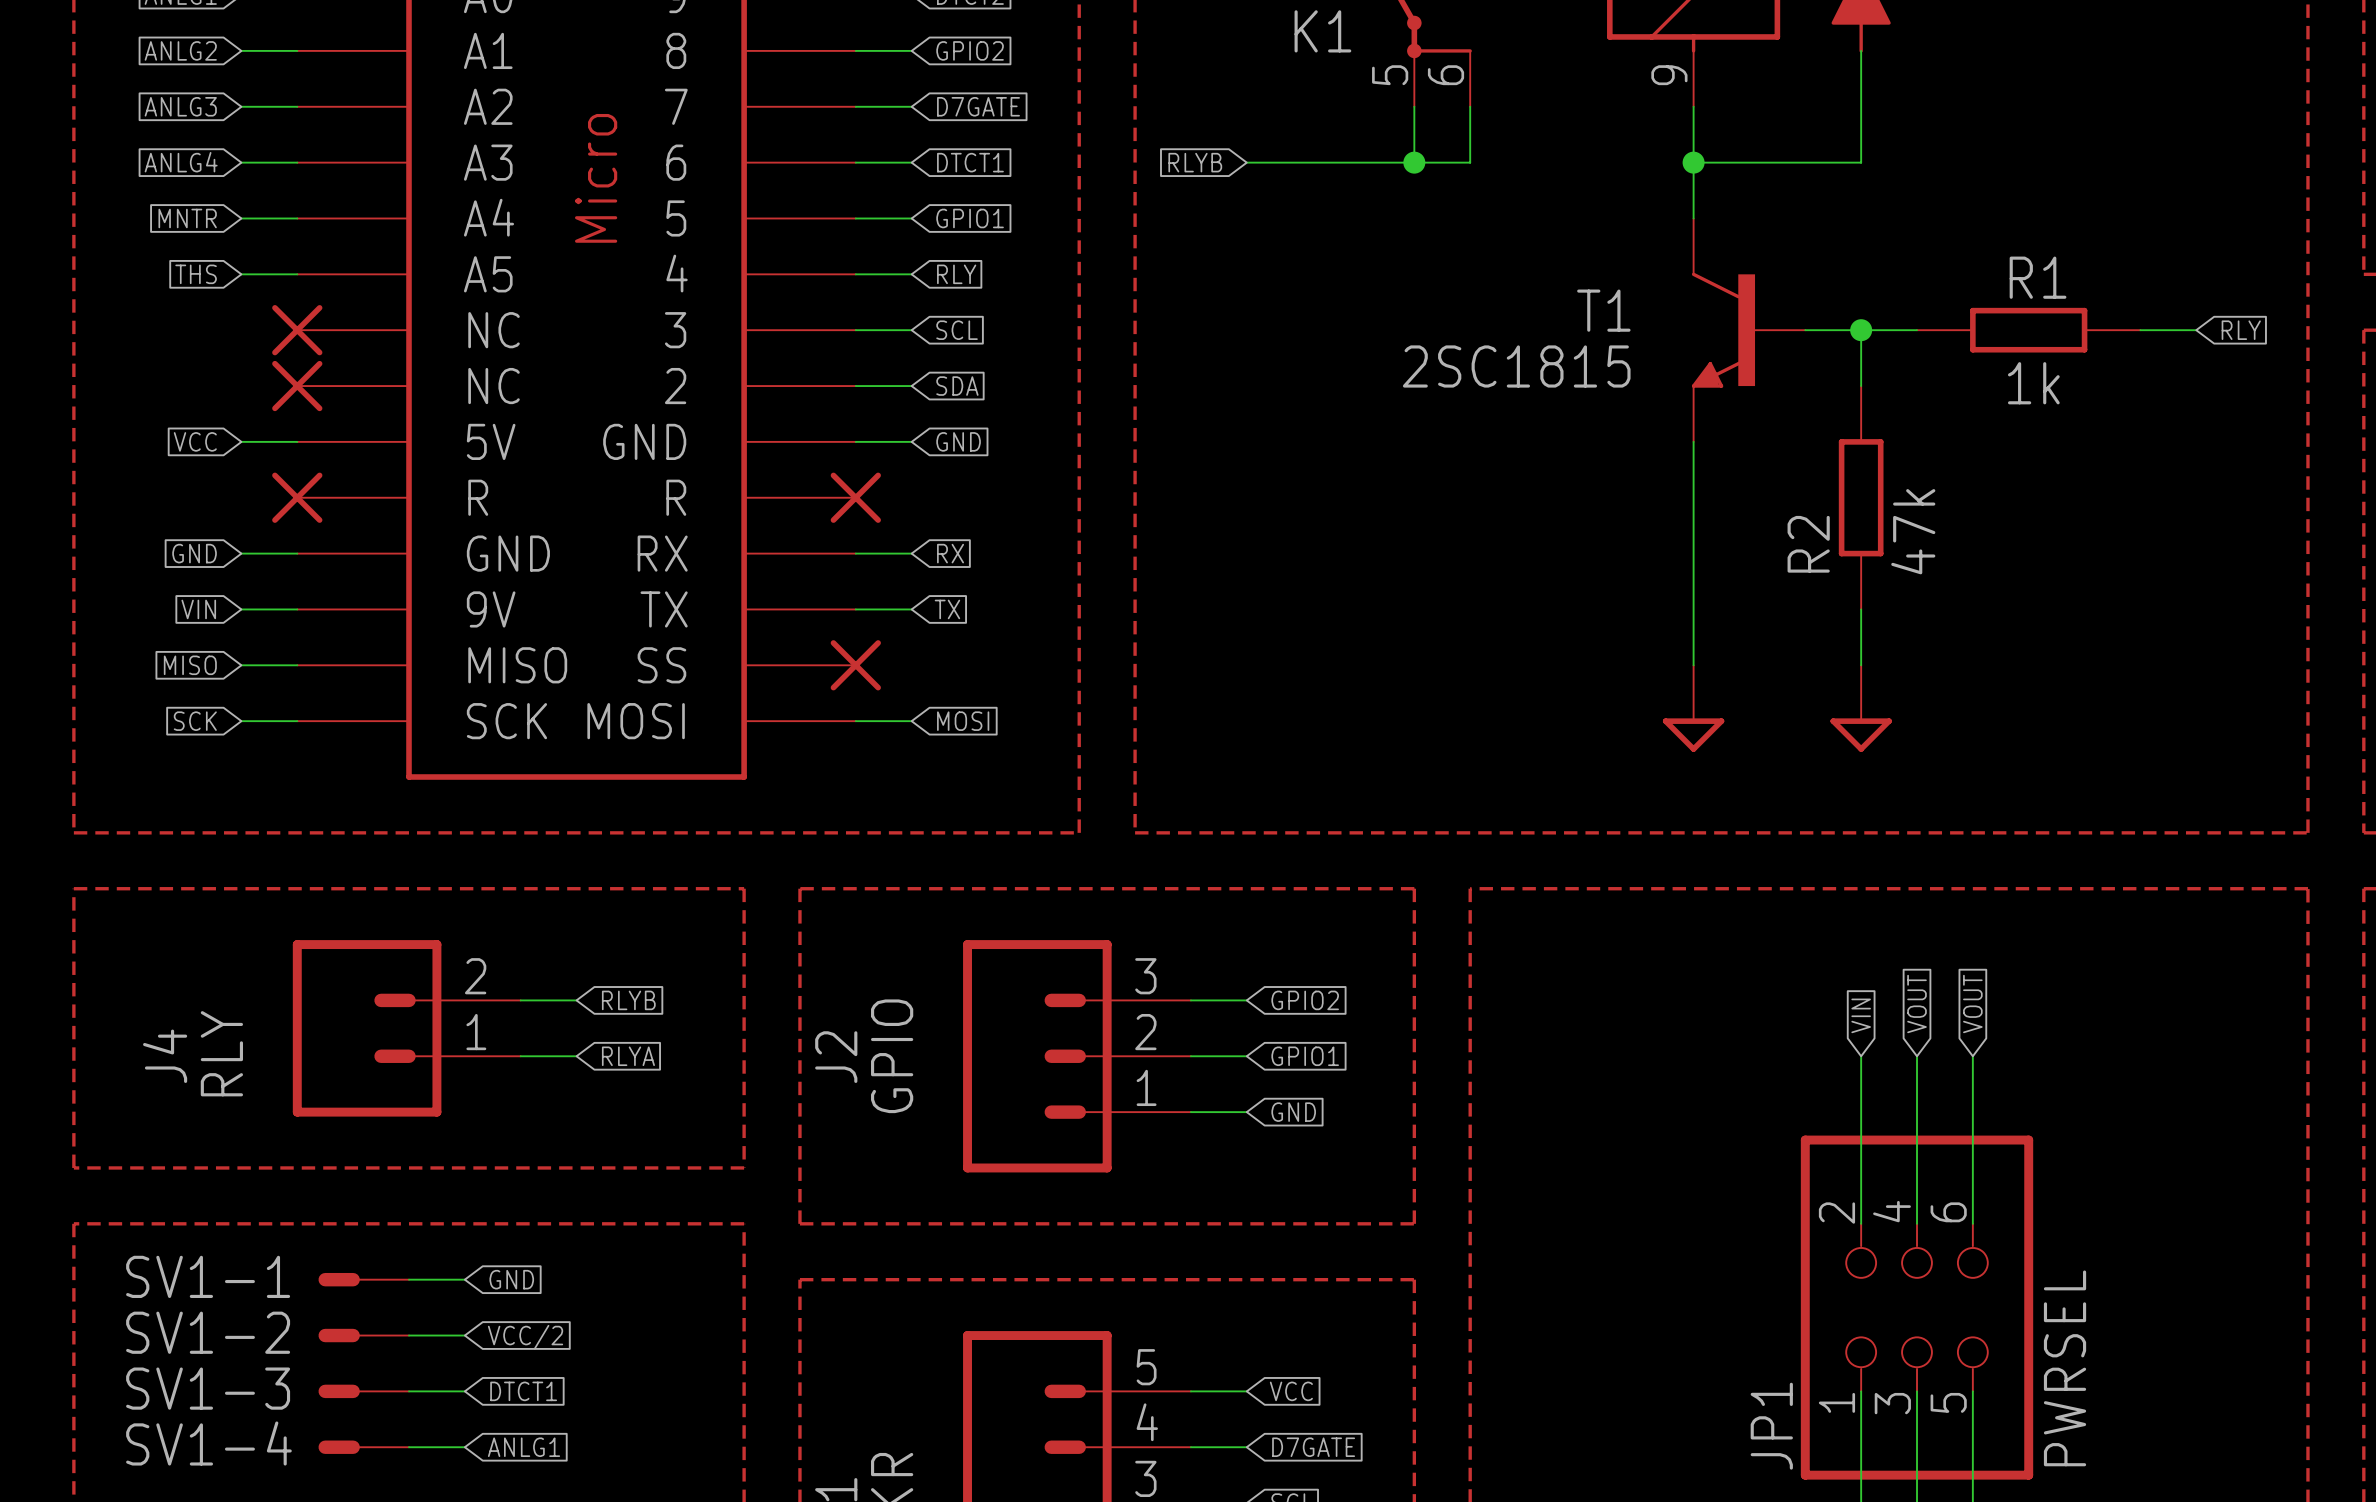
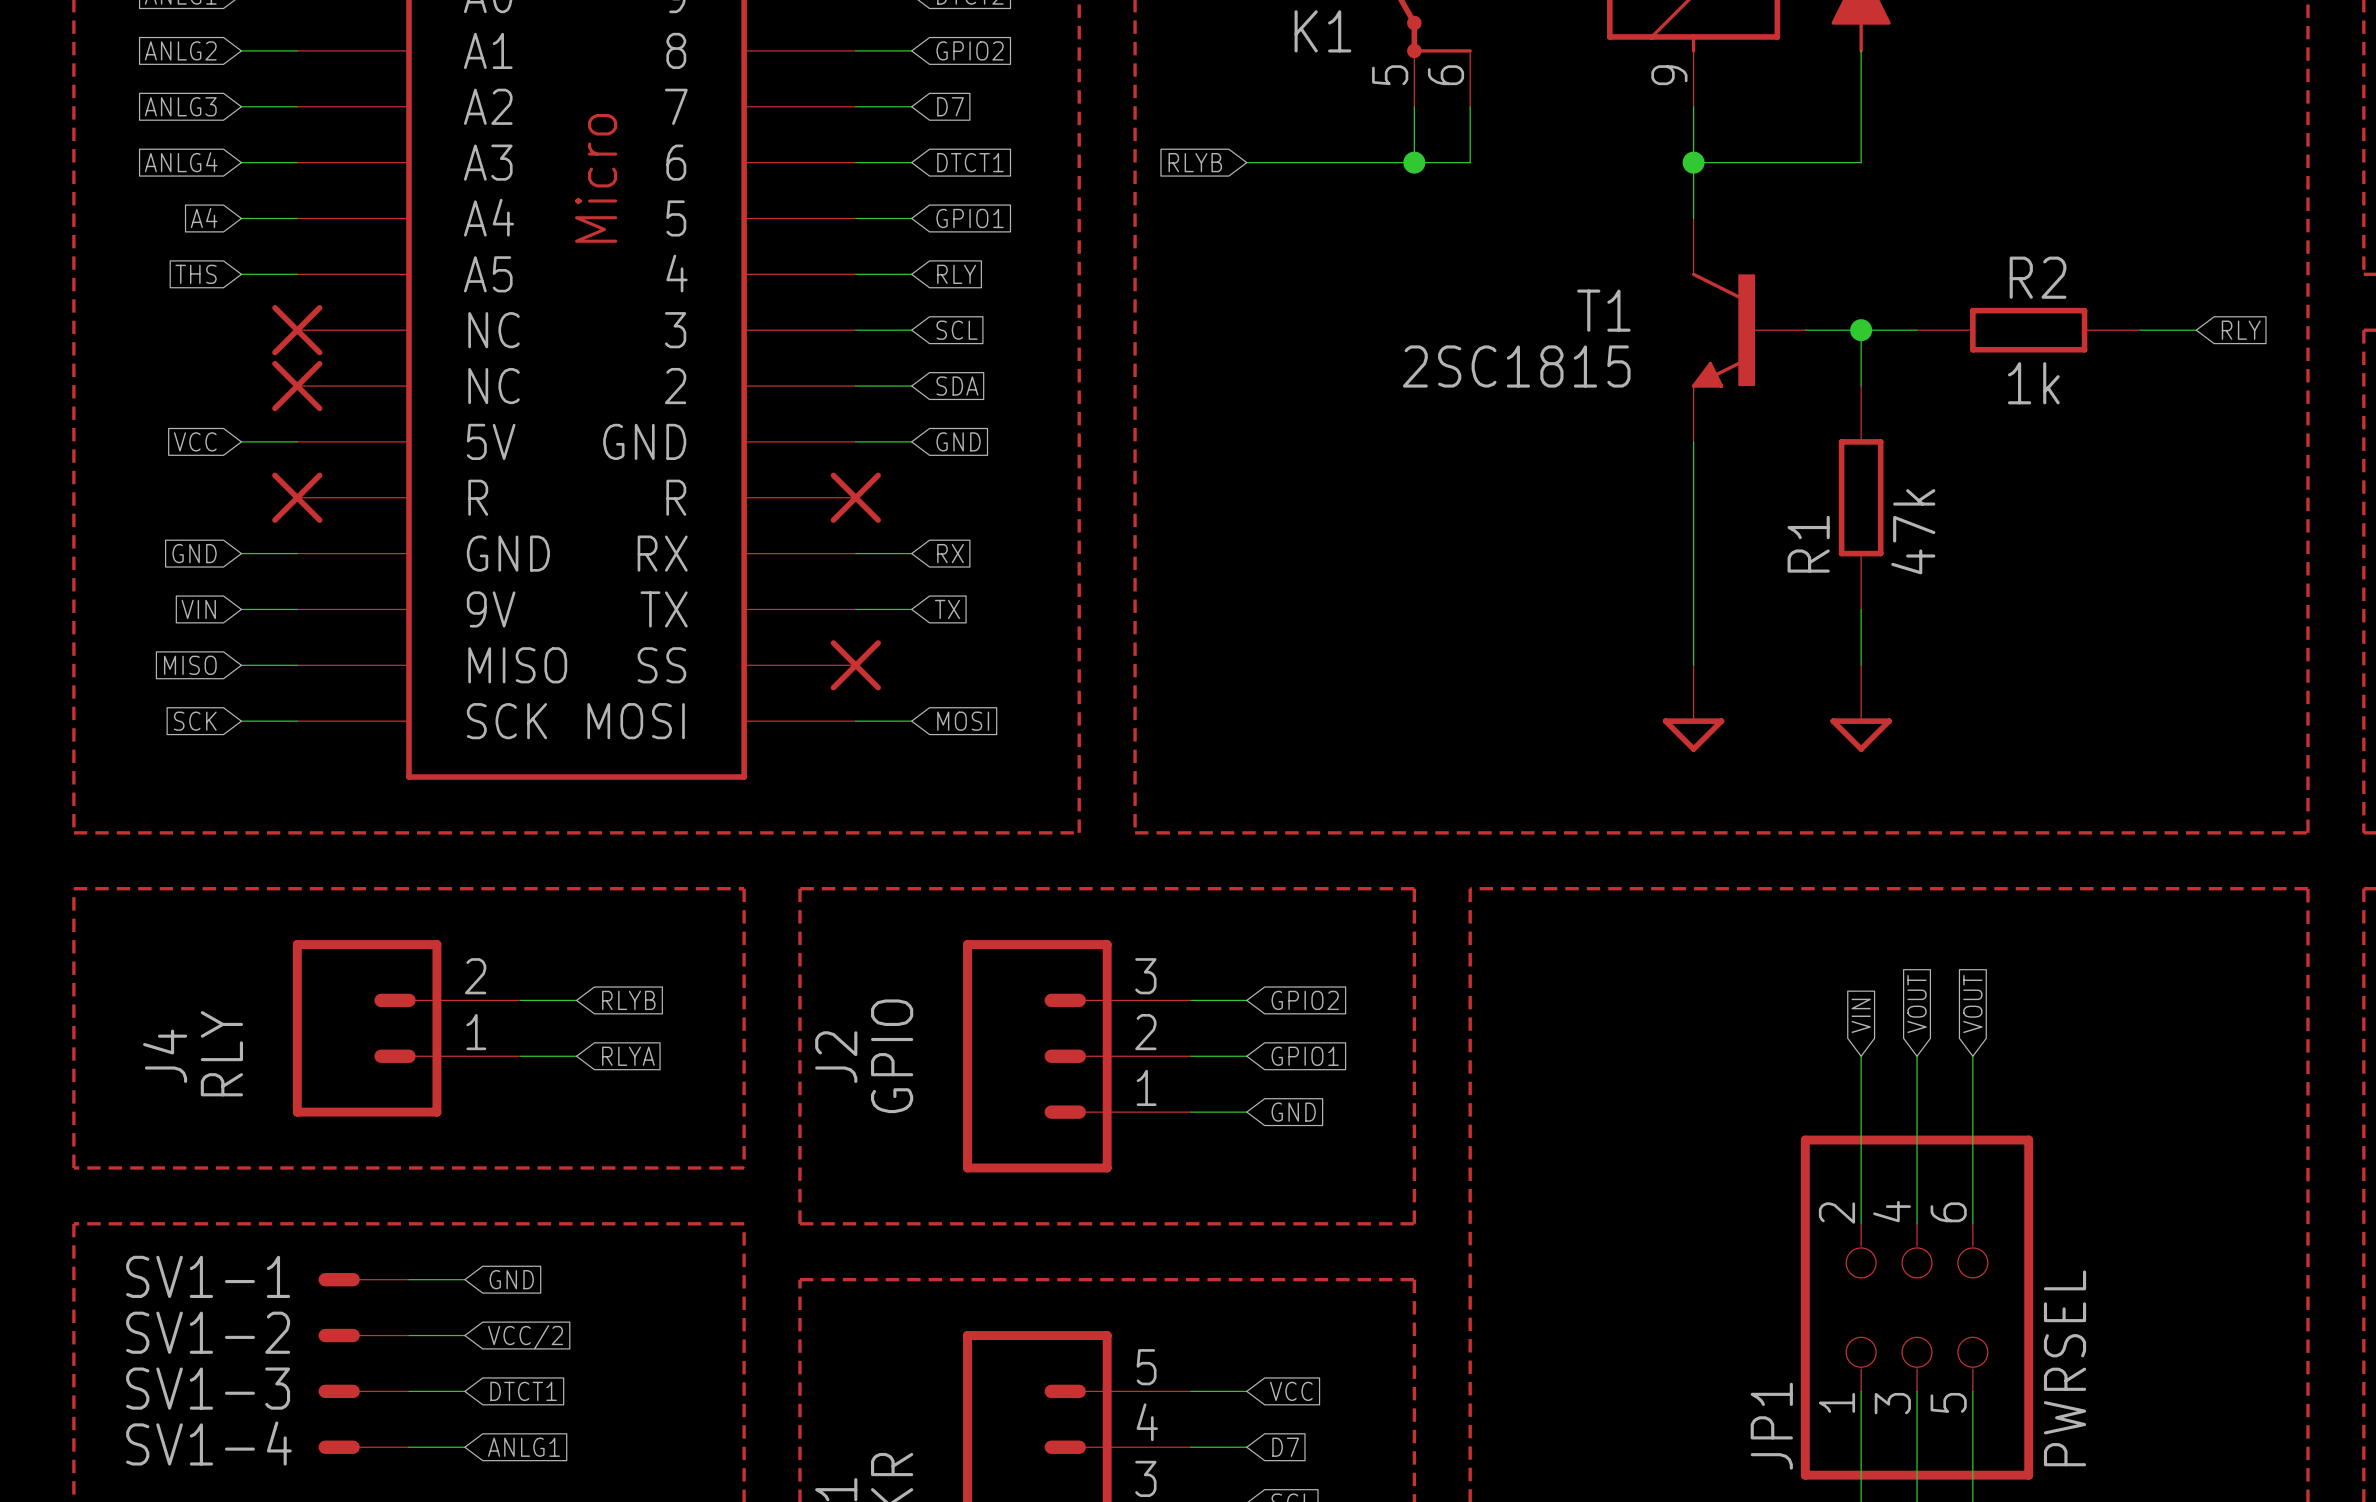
global label: D7GATE (978, 106) -> D7 (950, 106)
global label: MNTR (187, 218) -> A4 (204, 218)
R1 name: R1 (2038, 277) -> R2 (2038, 277)
R2 name: R2 (1808, 544) -> R1 (1808, 544)
global label: D7GATE (1313, 1447) -> D7 (1285, 1447)

